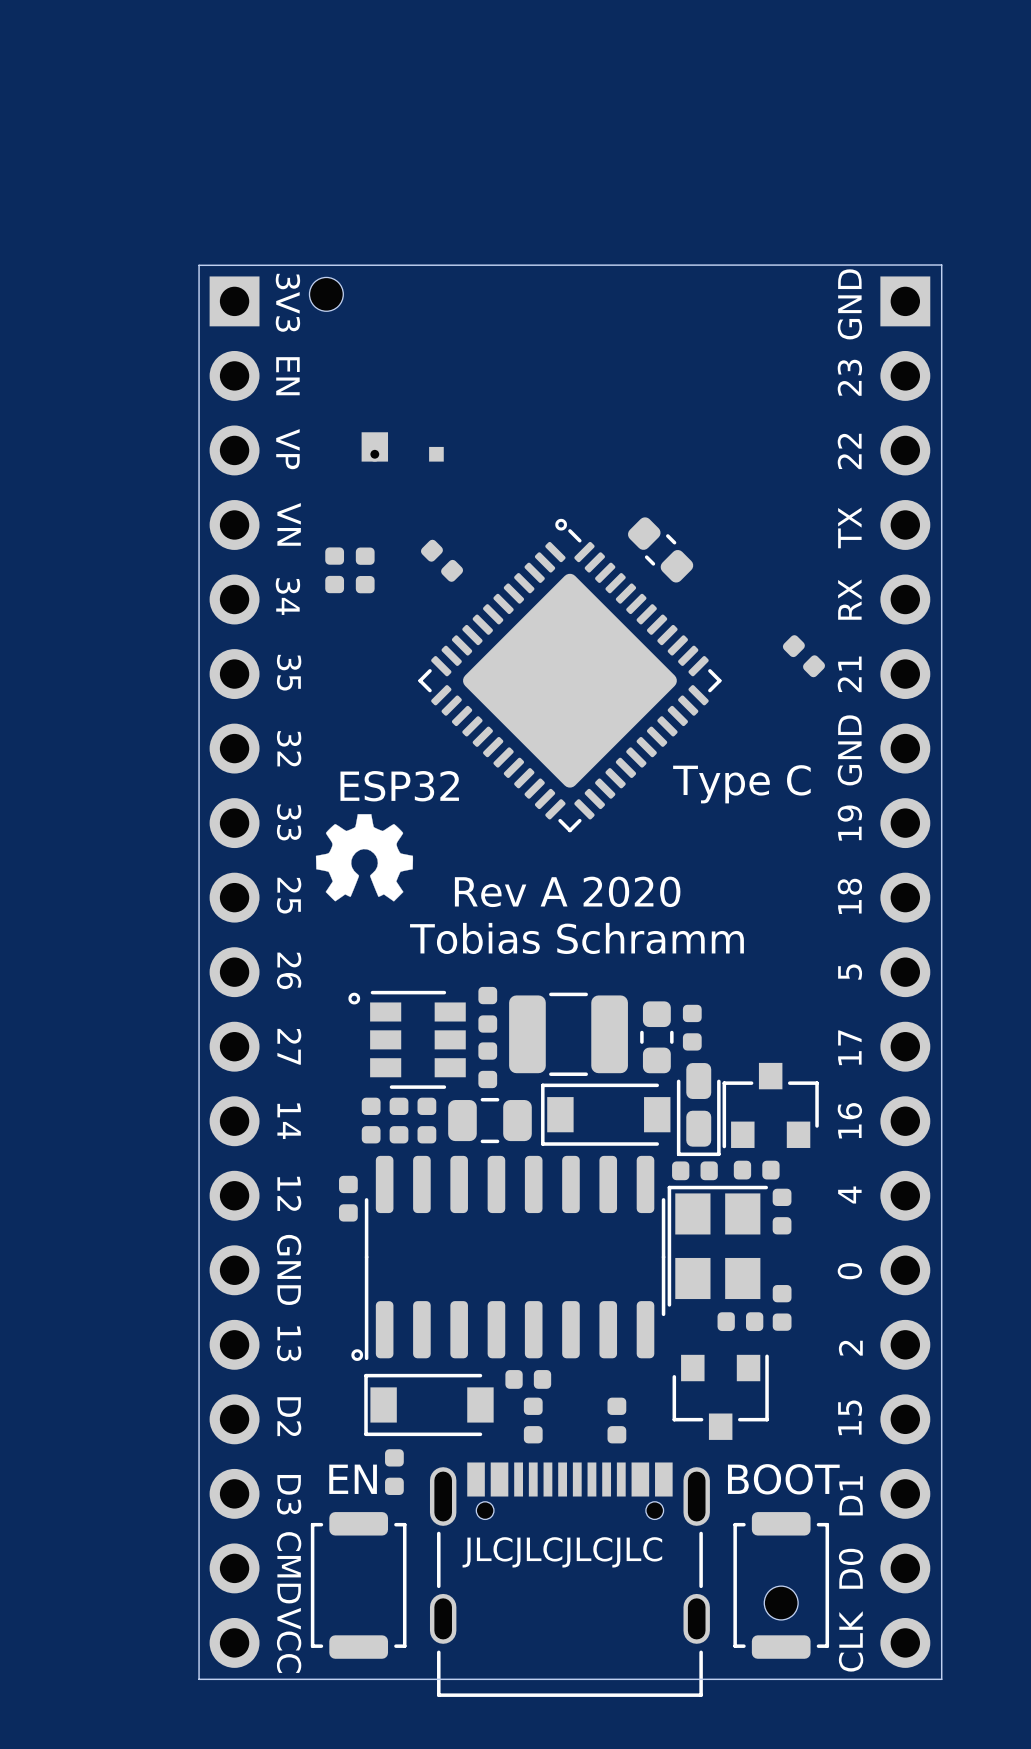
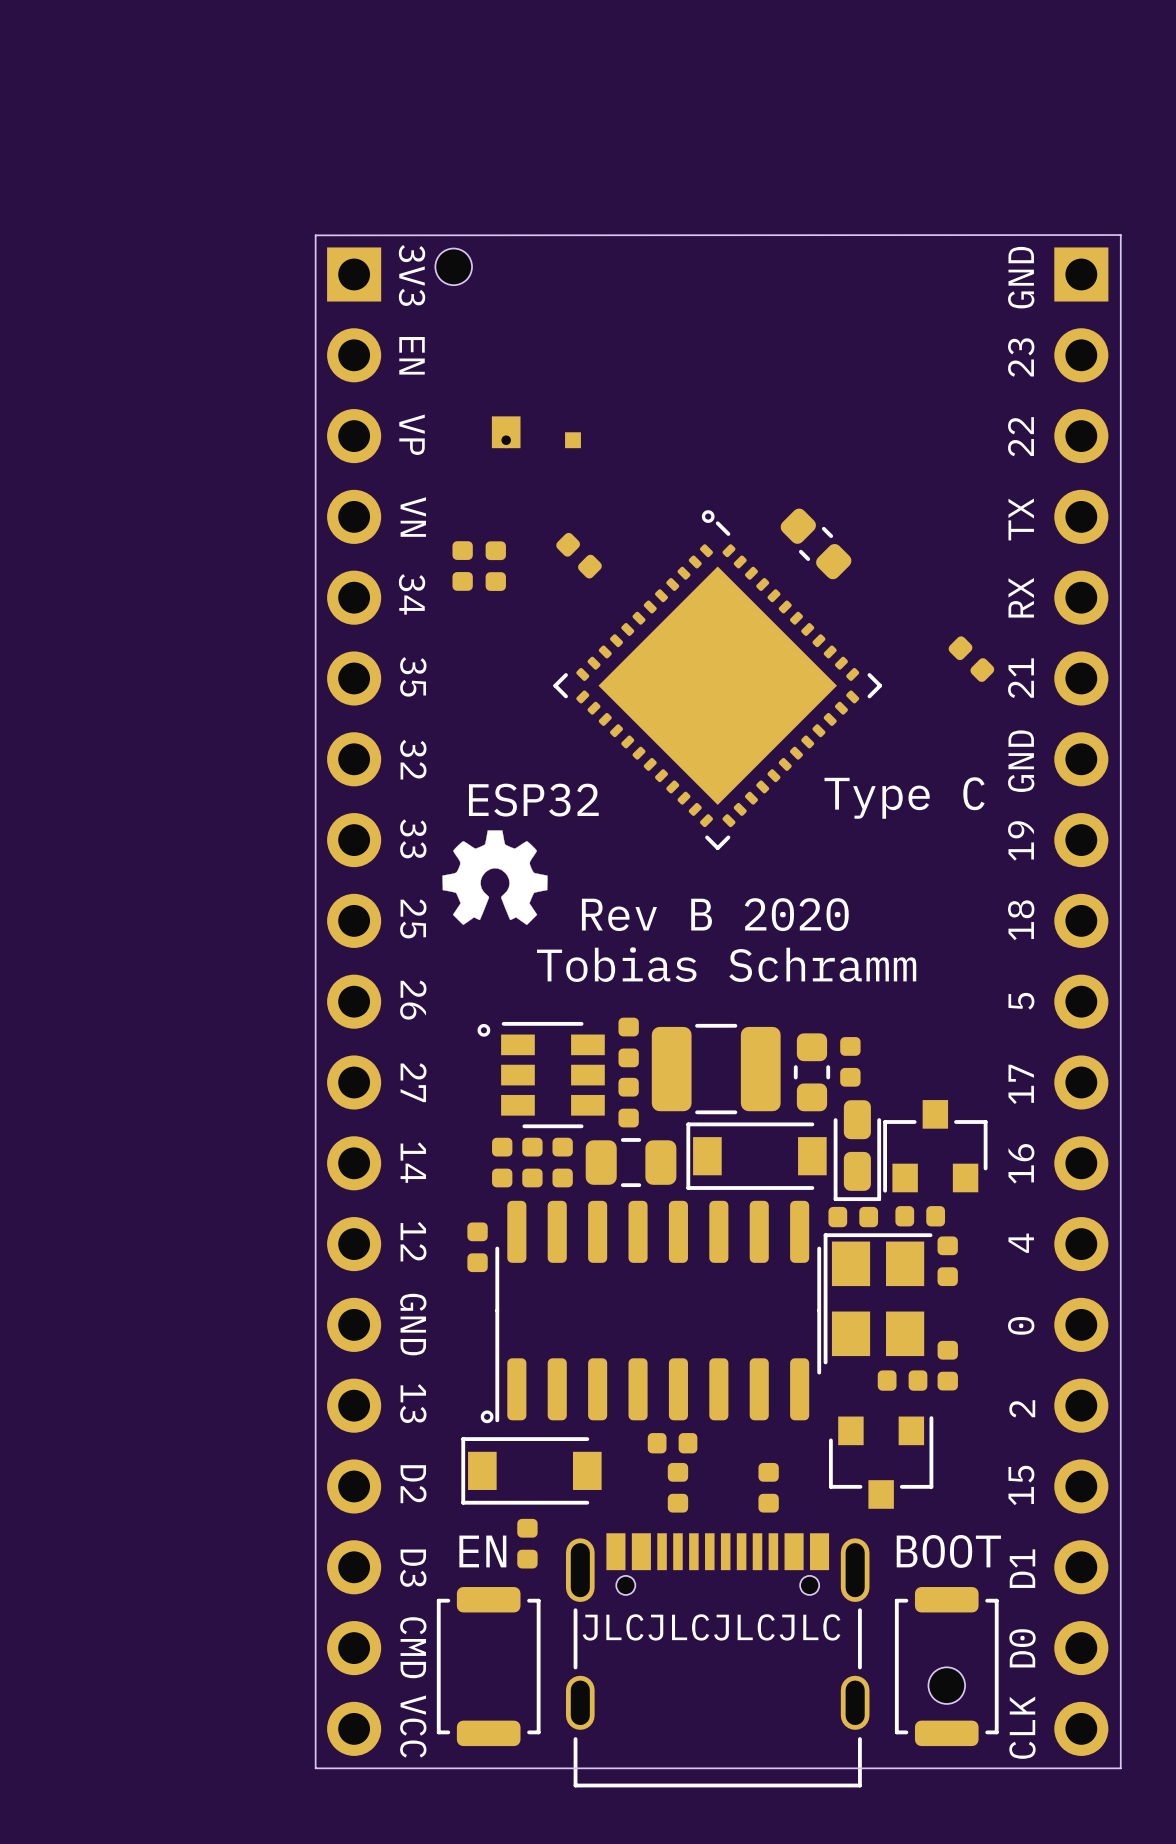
part footprint: [418, 529, 722, 833] -> [553, 521, 883, 851]
text: Rev A 2020 (567, 891) -> Rev B 2020 (715, 914)
part position: (428, 1404) -> (531, 1470)

